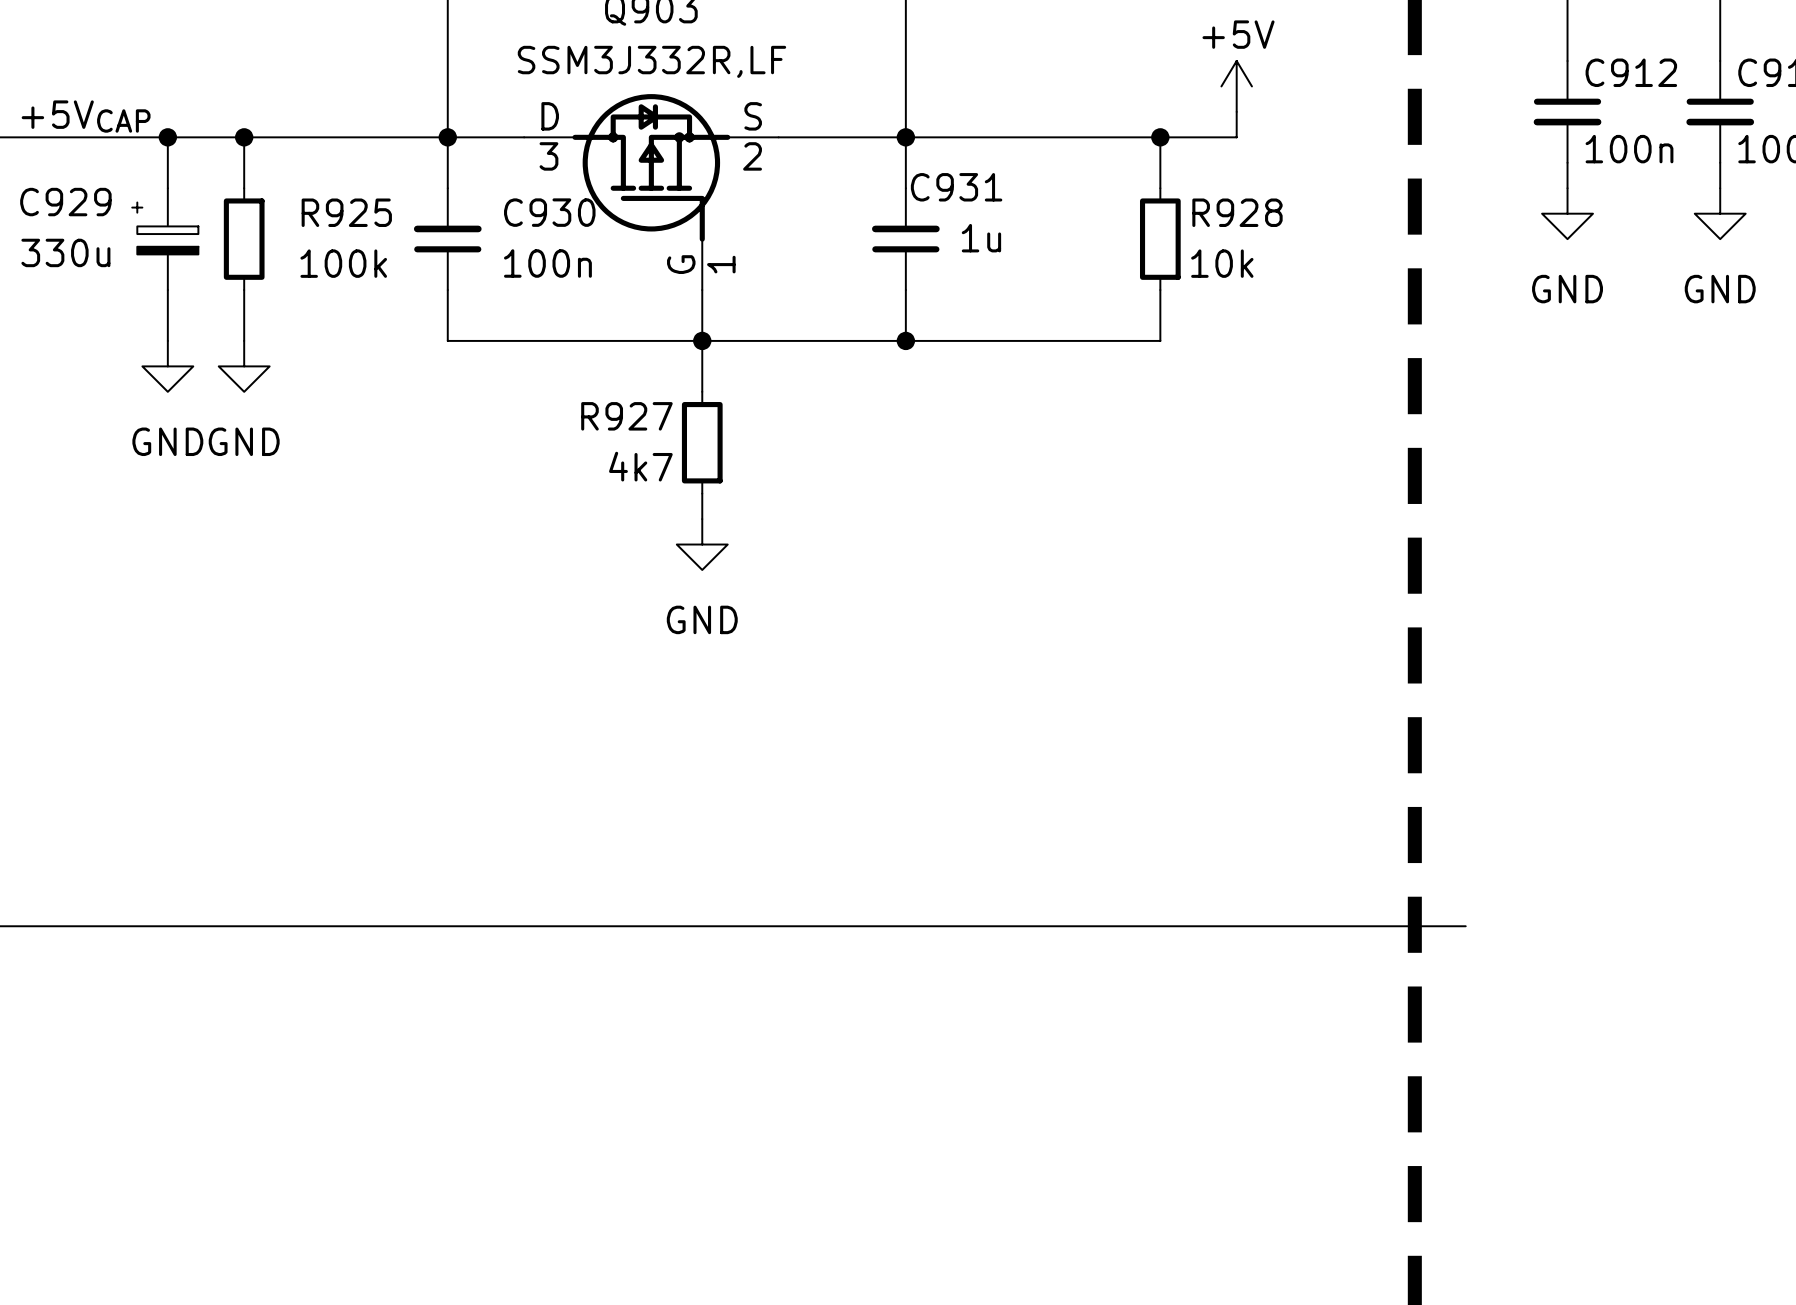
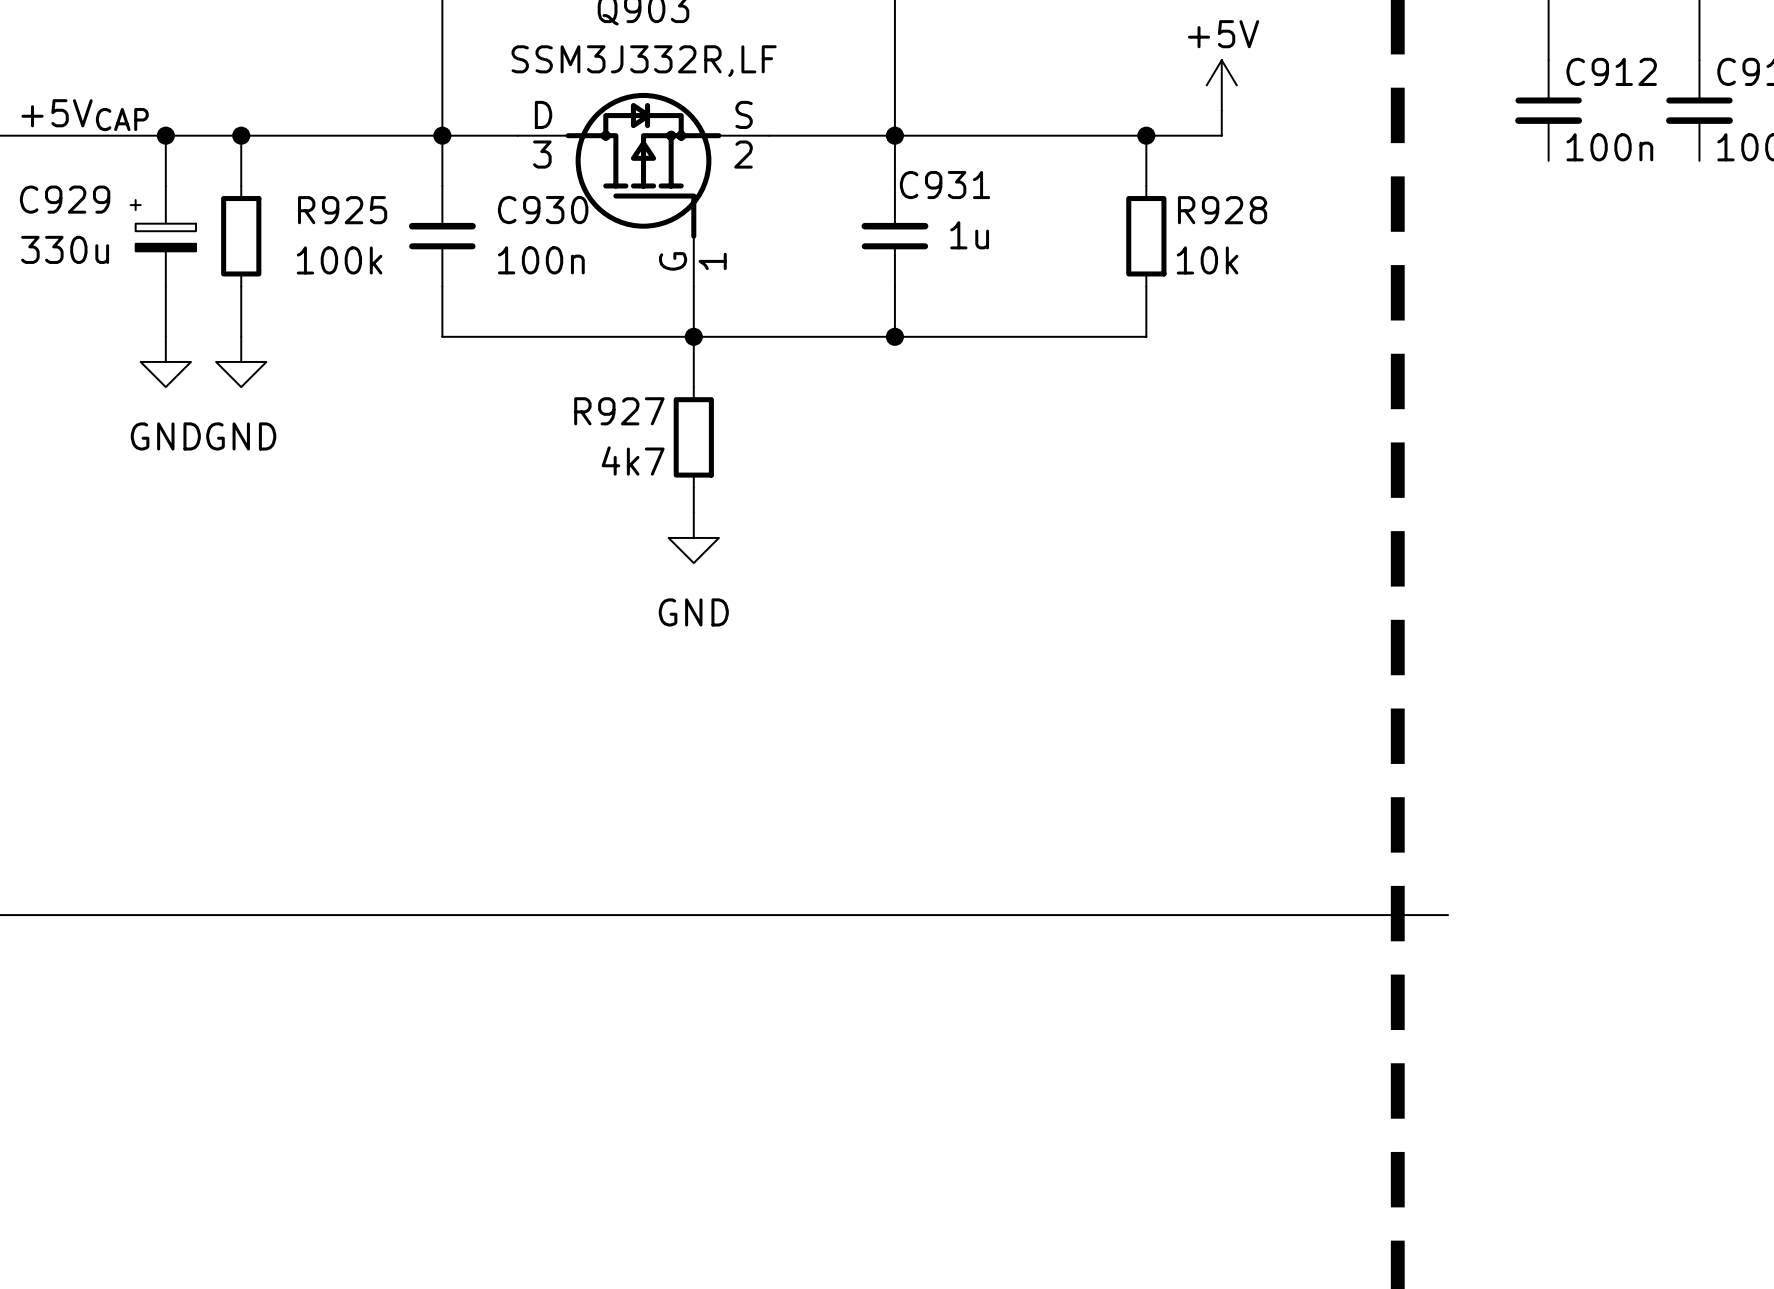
wire: (1567, 162) (1567, 188) -> none
wire: (1720, 162) (1720, 188) -> none
power symbol: GND (1567, 213) -> none
power symbol: GND (1720, 213) -> none

